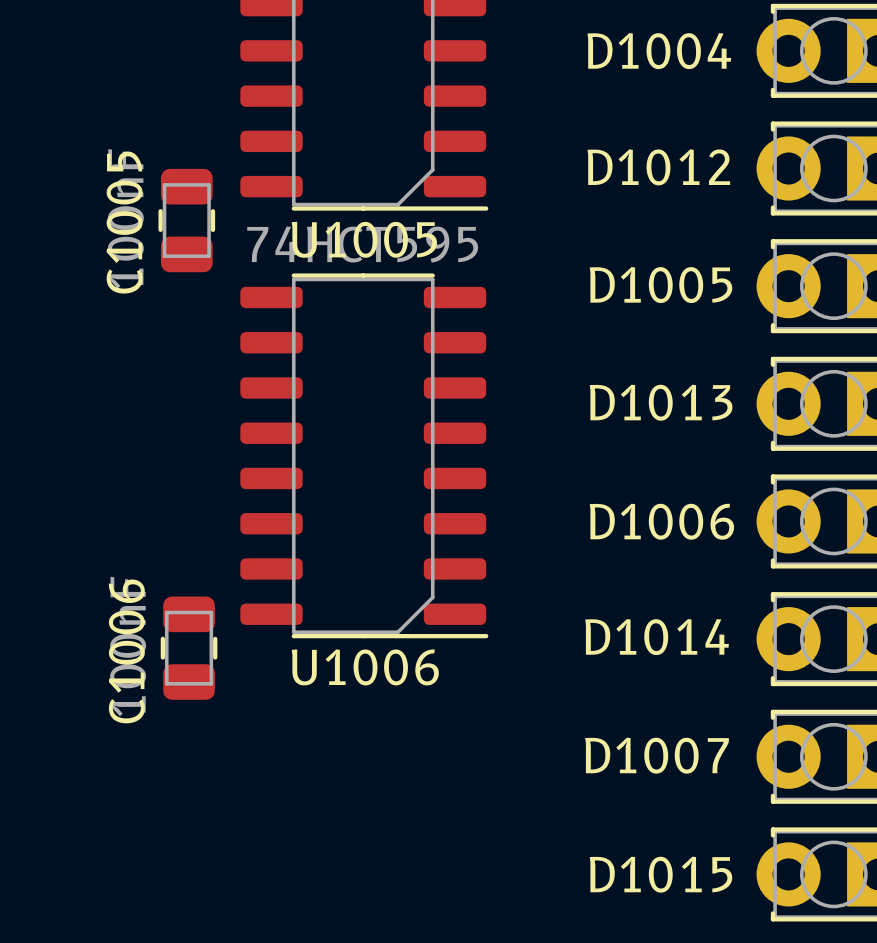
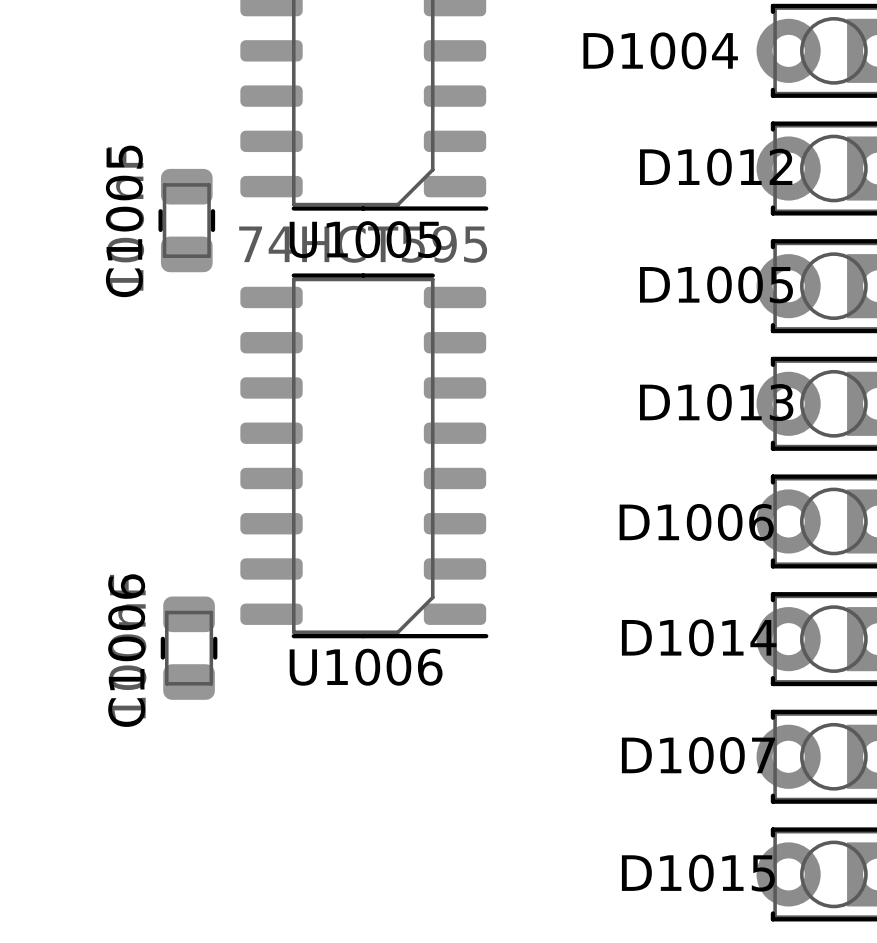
D1012 name position: D1012 (658, 167) -> D1012 (716, 167)
D1005 name position: D1005 (660, 285) -> D1005 (716, 284)
D1013 name position: D1013 (661, 402) -> D1013 (716, 402)
D1006 name position: D1006 (661, 521) -> D1006 (696, 522)
D1014 name position: D1014 (657, 637) -> D1014 (699, 637)
D1007 name position: D1007 (657, 755) -> D1007 (698, 755)
D1015 name position: D1015 (660, 874) -> D1015 (698, 873)

